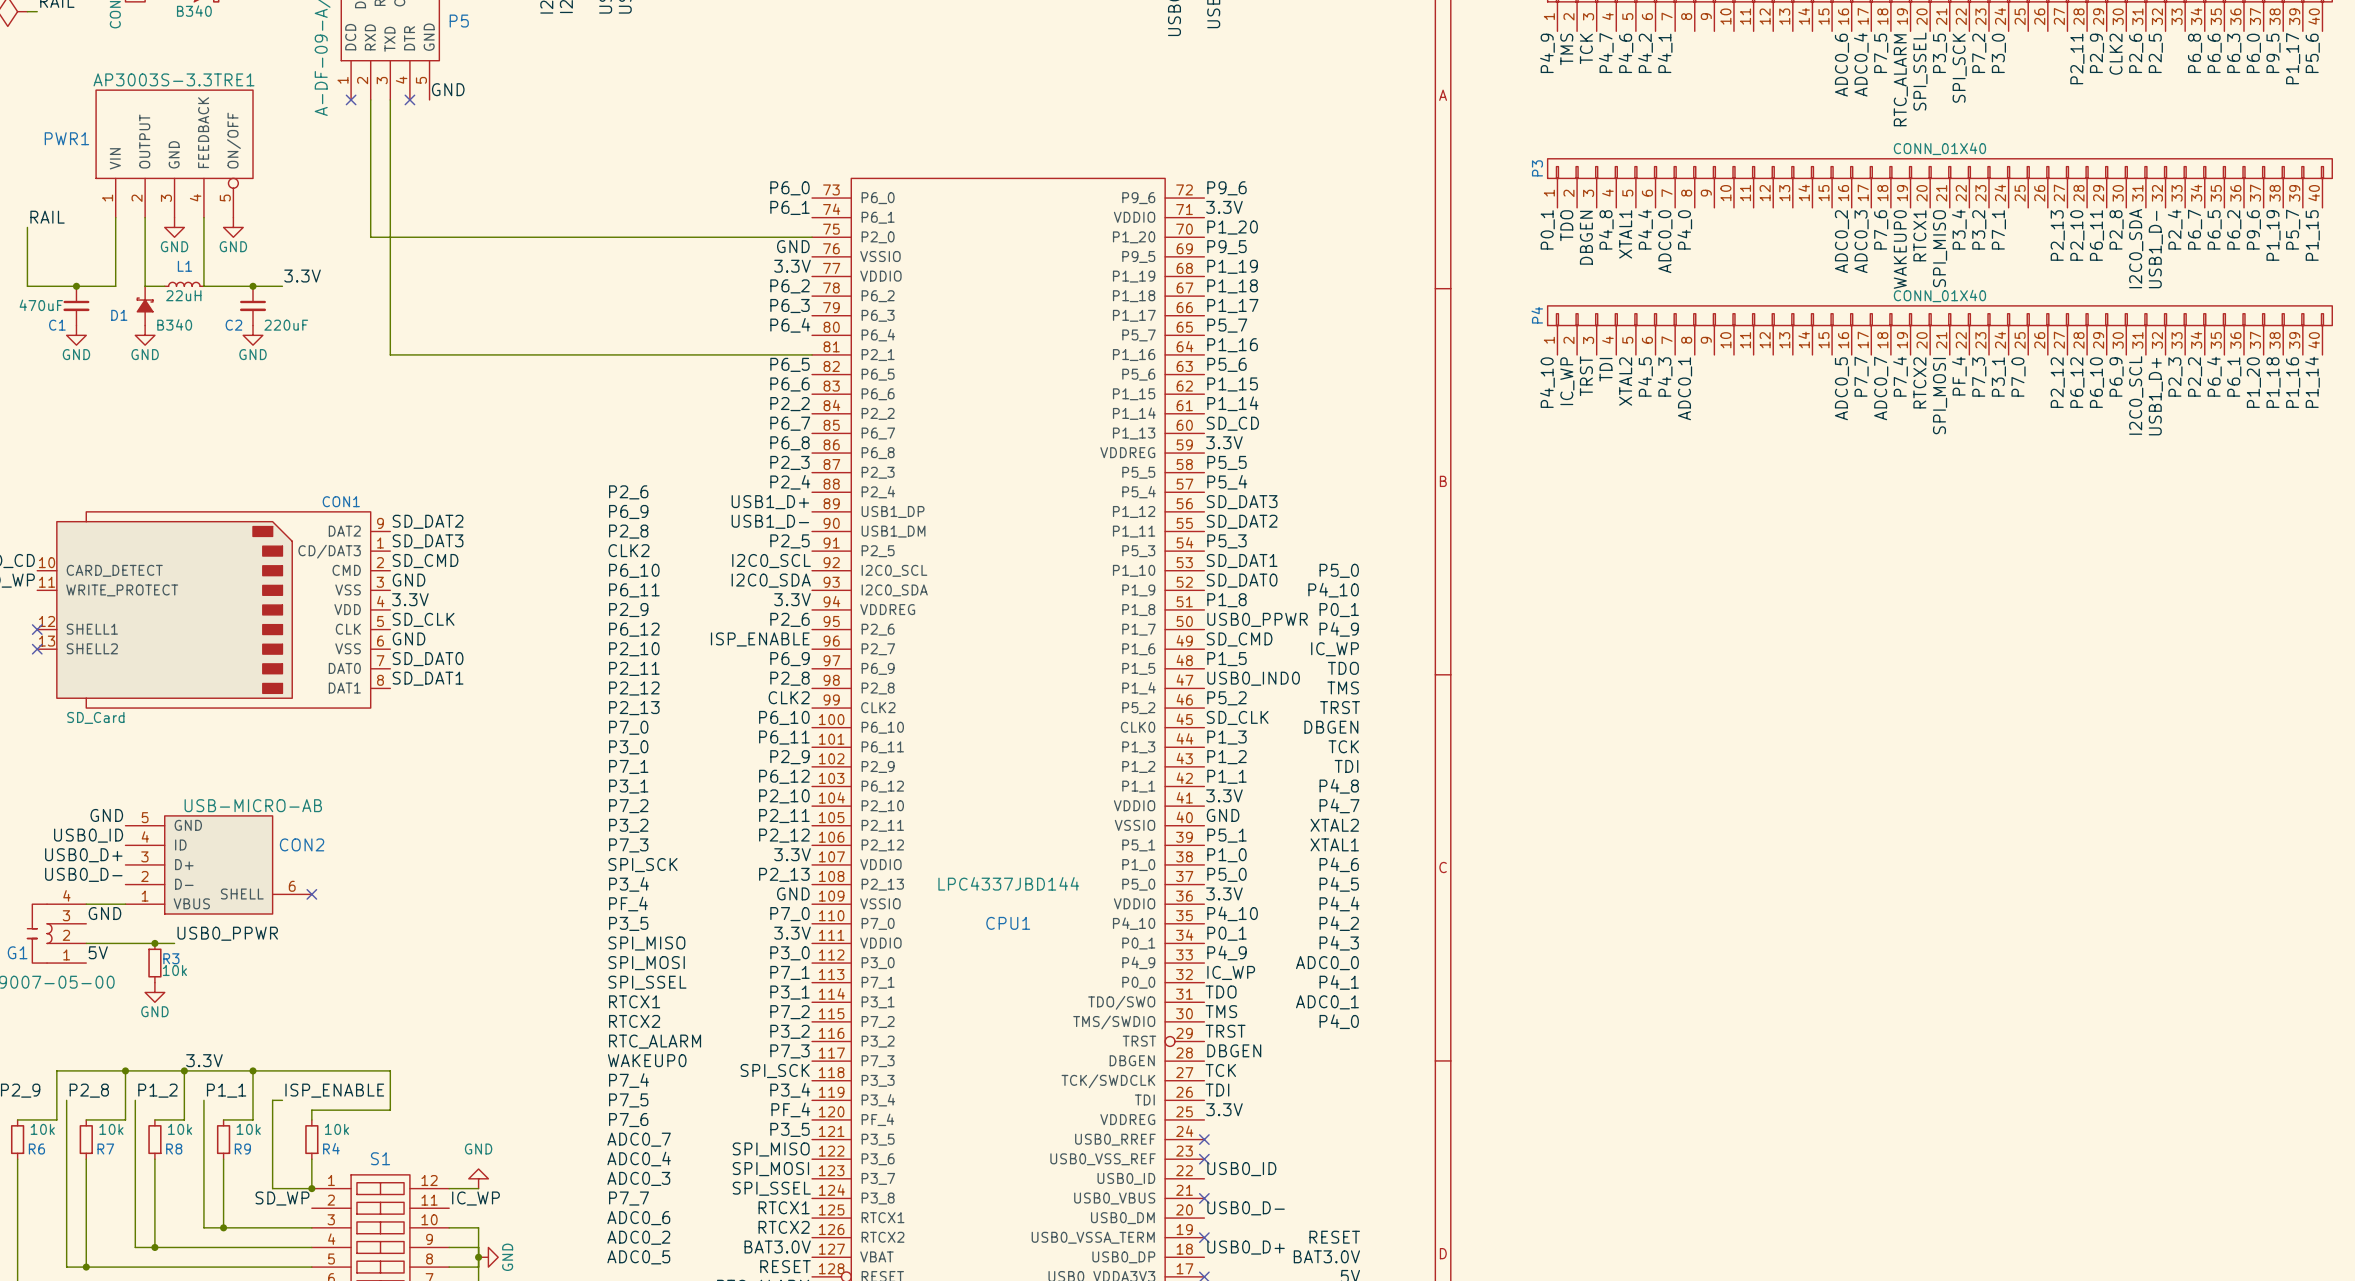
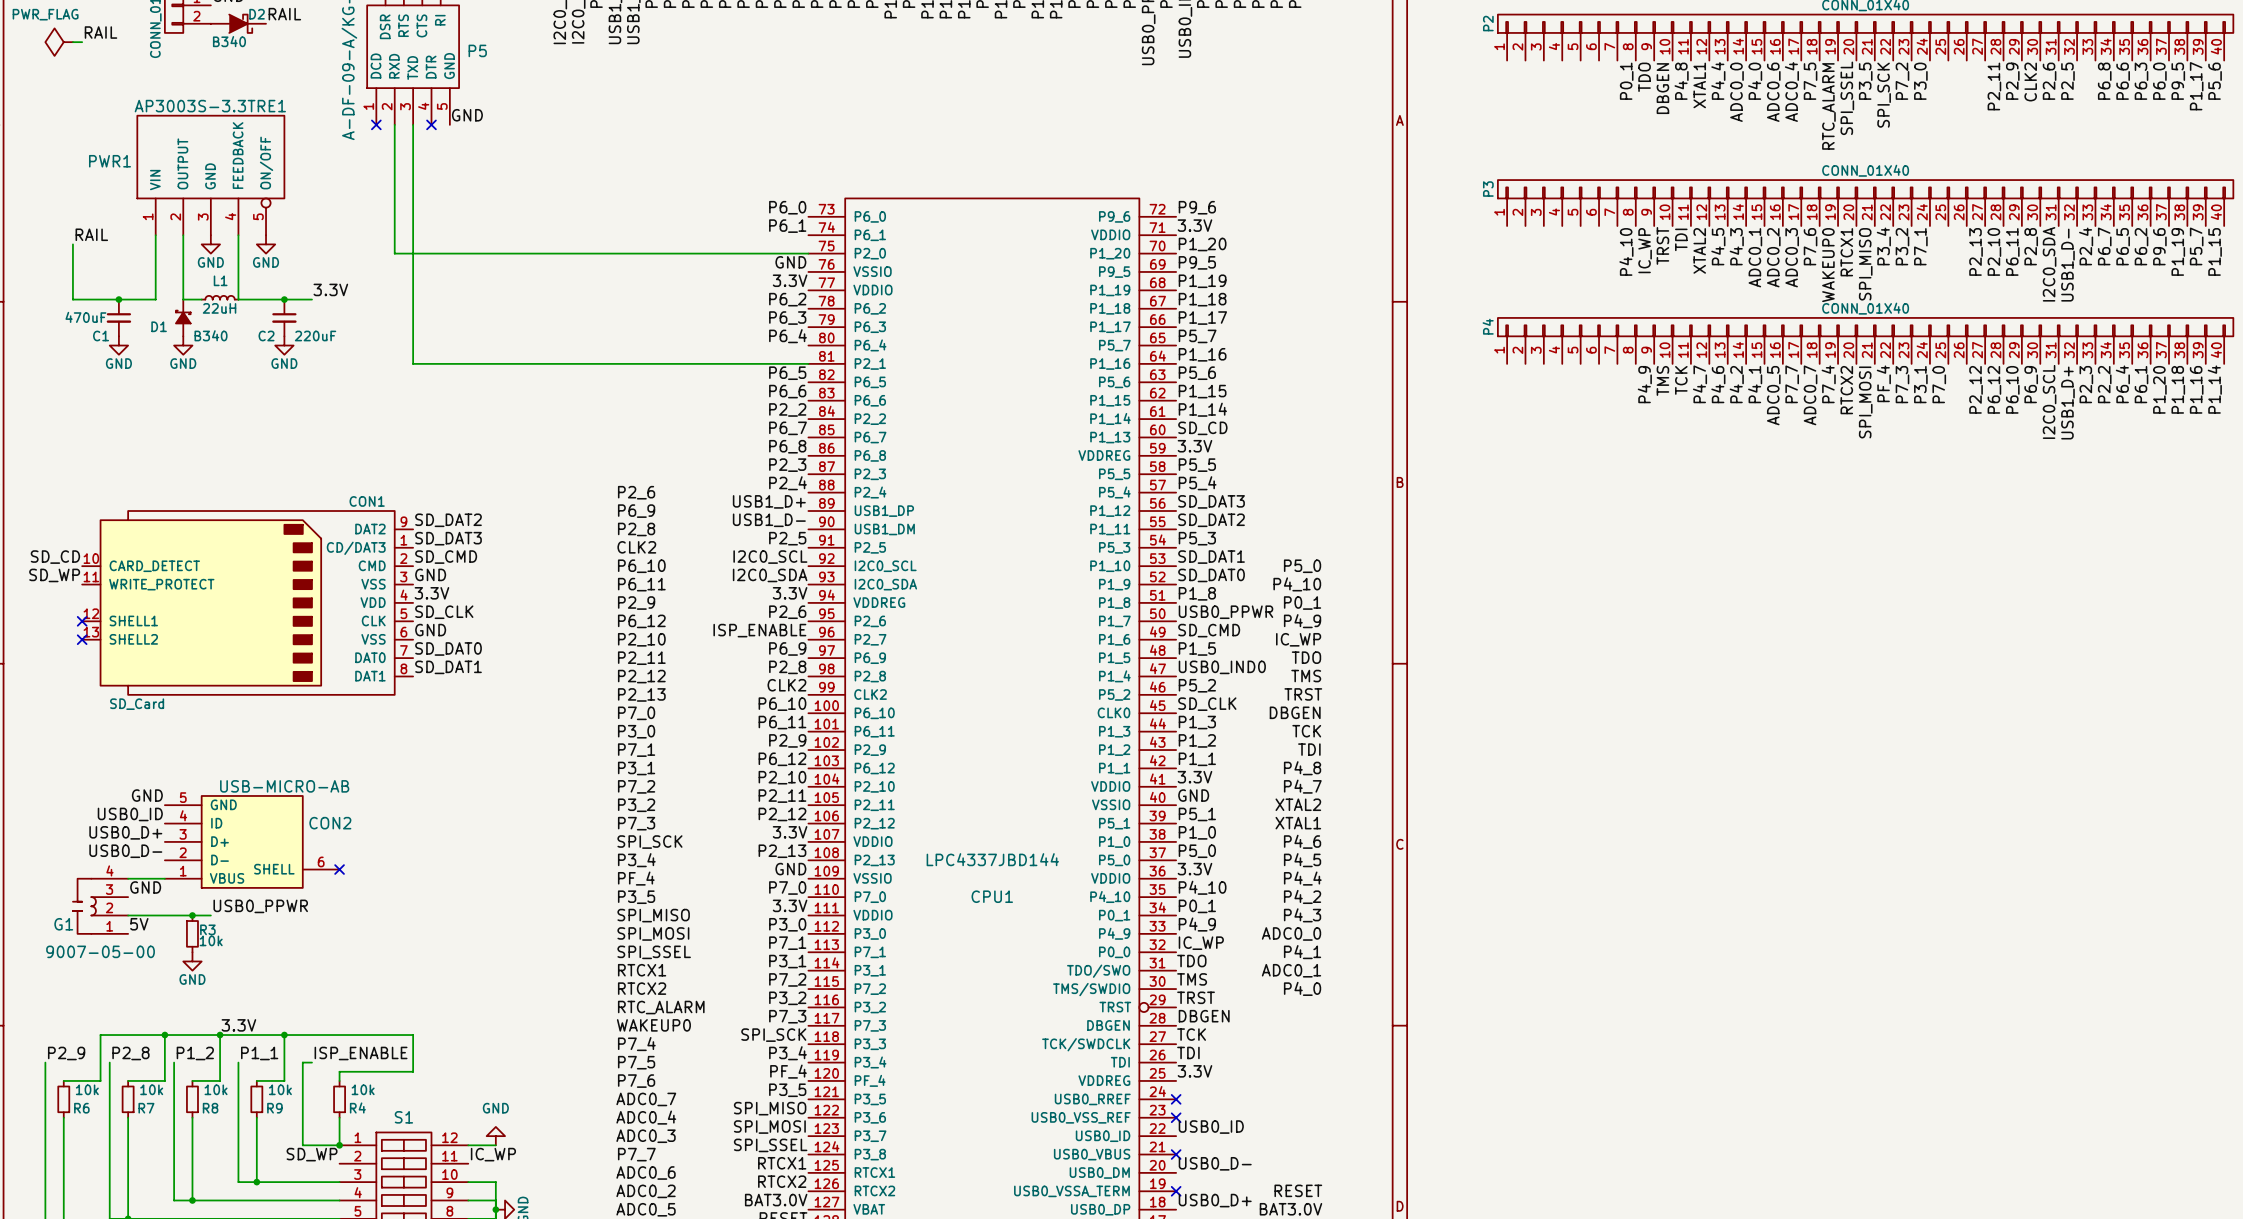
label: TCK (1586, 48) -> none
label: TMS (1566, 49) -> none
label: none -> TDO (1644, 77)
label: P4_9 (1547, 53) -> none
label: P4_7 (1606, 53) -> none
label: P4_6 (1625, 53) -> none
label: P4_2 (1645, 53) -> none
label: P4_1 (1665, 53) -> P0_1 (1626, 81)
label: none -> P4_8 (1681, 81)
label: none -> P4_4 (1718, 80)
label: none -> P4_0 (1755, 81)
label: none -> XTAL1 (1699, 85)
label: none -> DBGEN (1662, 88)
label: none -> ADC0_0 (1737, 92)
label: none -> TDI (1681, 239)
label: TDO (1566, 225) -> none
label: P0_1 (1547, 229) -> none
label: P4_8 (1606, 229) -> none
label: P4_4 (1645, 229) -> none
label: P4_0 (1684, 229) -> P4_10 (1626, 251)
label: none -> TRST (1662, 245)
label: none -> P4_5 (1718, 246)
label: none -> P4_3 (1736, 246)
label: XTAL1 (1625, 234) -> none
label: none -> IC_WP (1645, 250)
label: none -> XTAL2 (1699, 250)
label: DBGEN (1586, 237) -> none
label: ADC0_0 (1665, 241) -> none
label: none -> ADC0_1 (1755, 257)
label: TDI (1606, 369) -> none
label: none -> TCK (1681, 380)
label: none -> TMS (1662, 380)
label: TRST (1586, 376) -> none
label: none -> P4_7 (1699, 384)
label: P4_5 (1645, 377) -> none
label: P4_3 (1665, 377) -> none
label: none -> P4_9 (1644, 384)
label: none -> P4_6 (1718, 384)
label: none -> P4_2 (1736, 384)
label: none -> P4_1 (1755, 384)
label: IC_WP (1567, 381) -> none
label: XTAL2 (1625, 381) -> none
label: P4_10 (1547, 382) -> none
label: ADC0_1 (1685, 388) -> none

